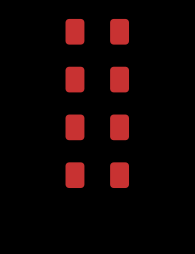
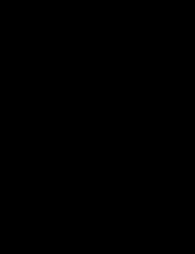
part: (97, 31) -> none
part: (97, 79) -> none
part: (97, 127) -> none
part: (97, 175) -> none

